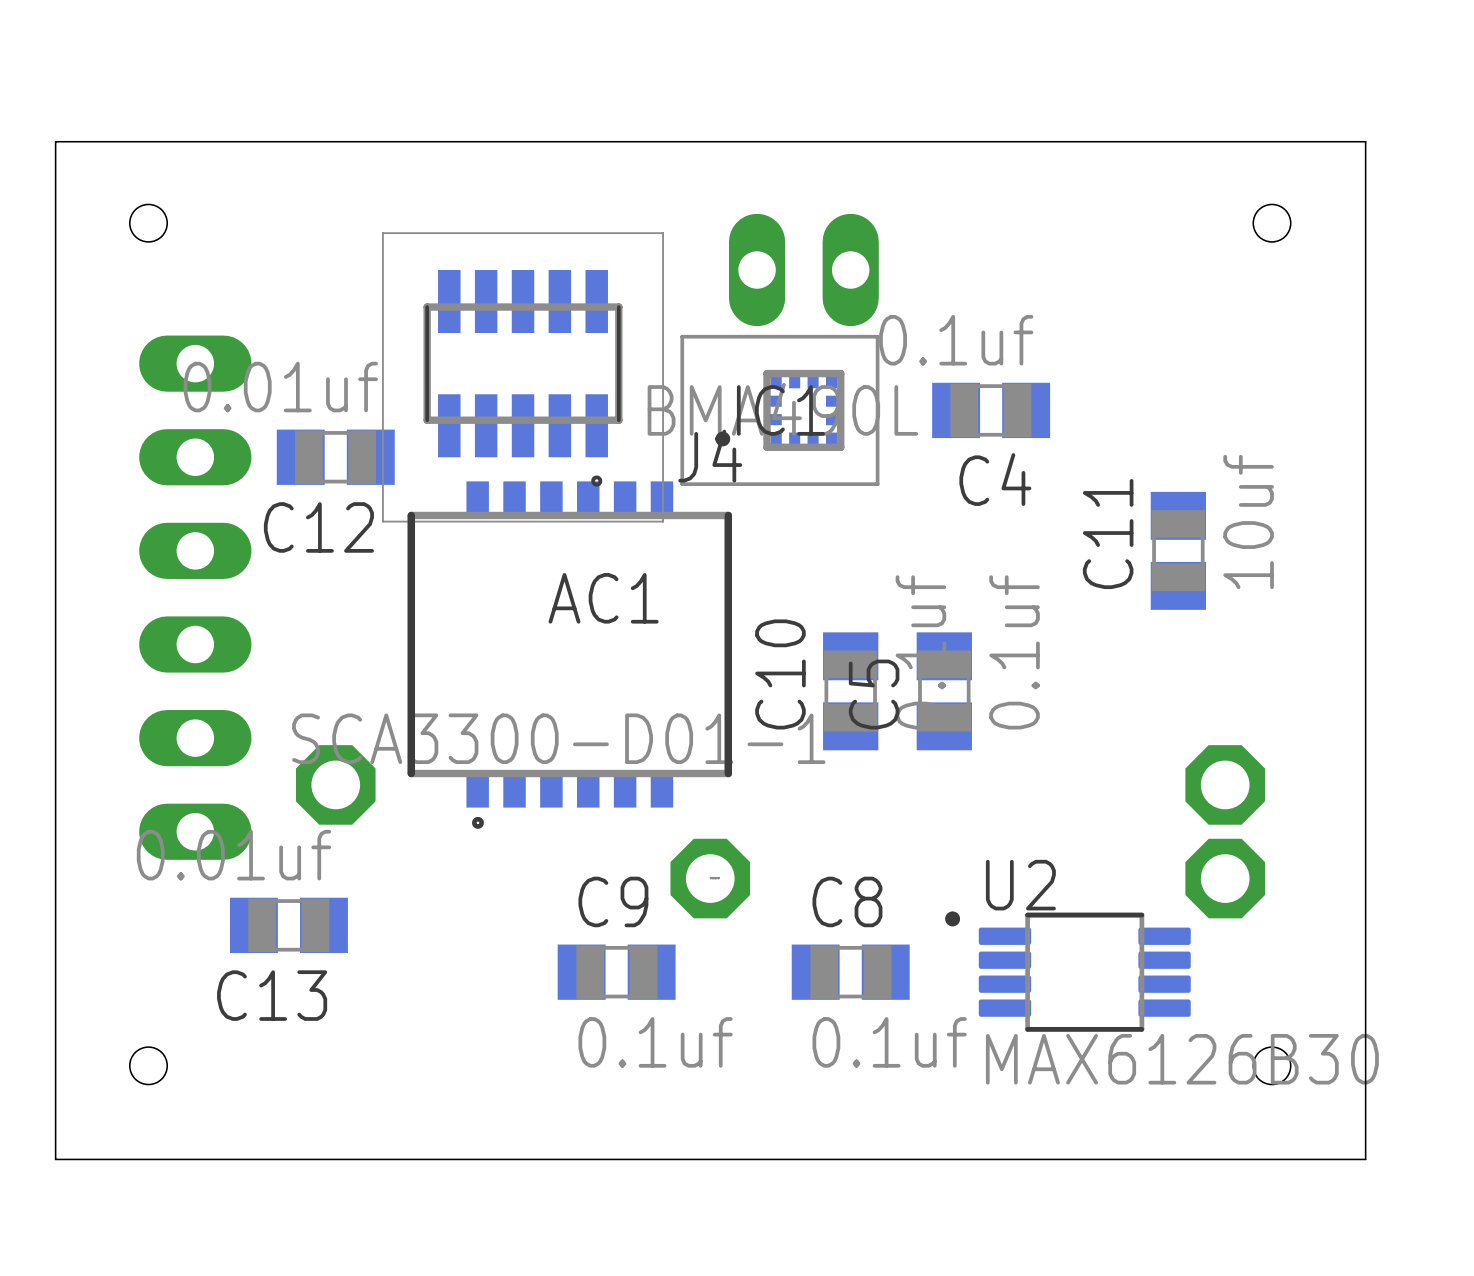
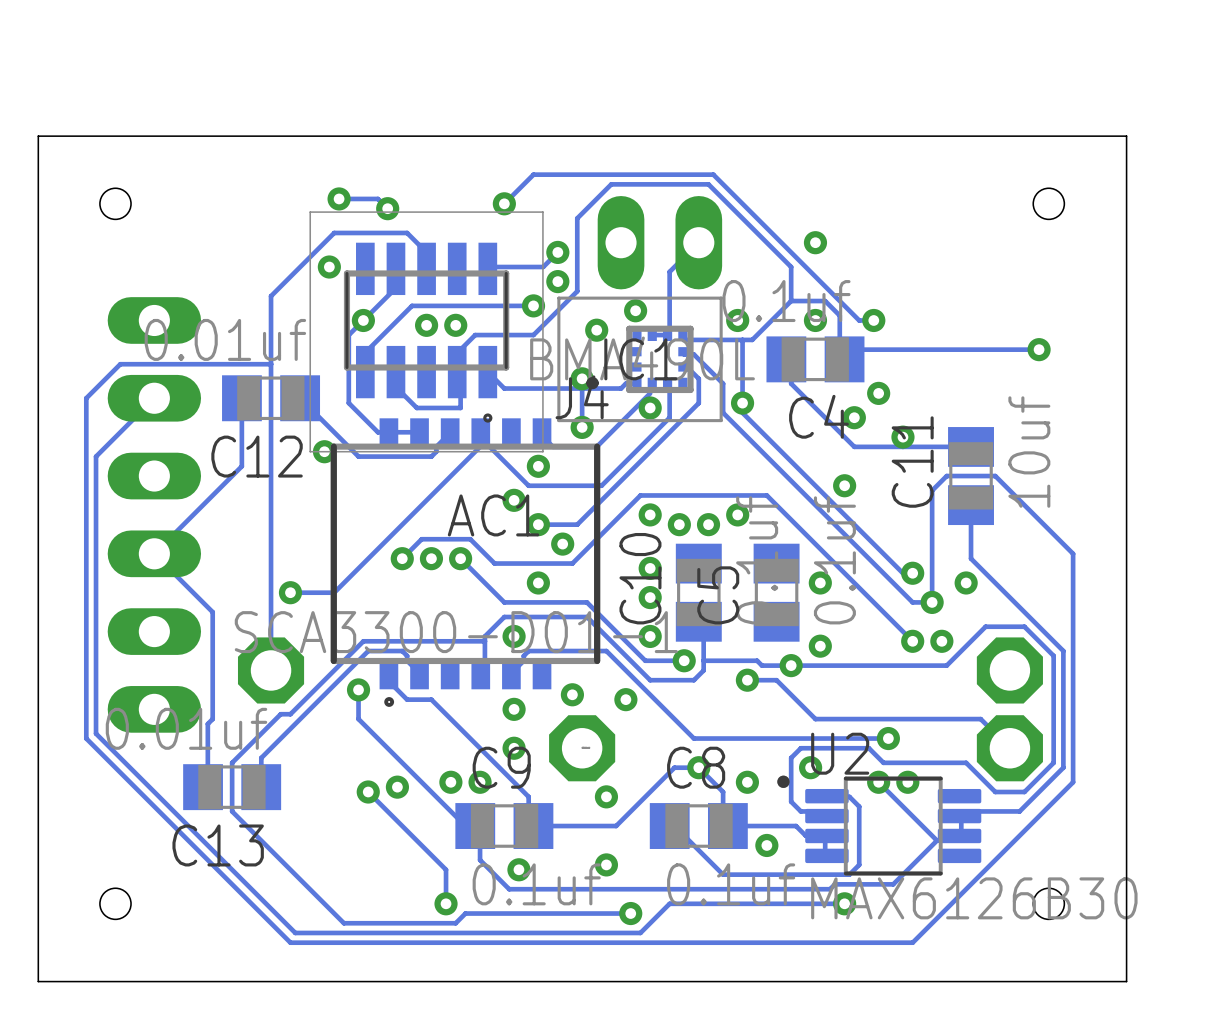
track: none -> (339, 198) (377, 198) (387, 208)
via: none -> (339, 198)
track: none -> (504, 203) (533, 174) (713, 174) (859, 320) (873, 320)
via: none -> (504, 203)
via: none -> (387, 208)
track: none -> (698, 242) (669, 271) (669, 335) (652, 335)
via: none -> (815, 242)
track: none -> (557, 252) (543, 267) (489, 267) (487, 268)
via: none -> (557, 252)
via: none -> (329, 267)
track: none -> (395, 268) (392, 271) (392, 291) (348, 335) (348, 403) (377, 432) (419, 433)
track: none -> (426, 268) (426, 252) (407, 232) (334, 232) (271, 296) (271, 670)
via: none -> (557, 281)
track: none -> (791, 301) (752, 339) (684, 339) (682, 335)
track: none -> (791, 301) (825, 301) (839, 315) (839, 359) (844, 359) (839, 349) (1039, 349)
track: none -> (791, 301) (791, 267) (708, 184) (611, 184) (577, 218) (577, 291) (533, 335) (475, 335) (460, 349) (460, 369) (457, 372) (460, 373) (460, 407) (416, 407) (397, 388) (395, 372)
track: none -> (533, 305) (412, 305) (368, 349) (368, 369) (365, 372)
via: none -> (533, 305)
via: none -> (635, 310)
via: none -> (363, 320)
via: none -> (737, 320)
via: none -> (815, 320)
via: none -> (873, 320)
via: none -> (426, 325)
via: none -> (455, 325)
via: none -> (596, 330)
track: none -> (742, 339) (742, 412) (902, 573) (912, 573)
via: none -> (1039, 349)
track: none -> (683, 351) (684, 354) (693, 354) (723, 383) (723, 412) (912, 602) (932, 602) (932, 490) (946, 476) (995, 476) (1073, 553) (1073, 782) (912, 942) (290, 942) (86, 738) (86, 398) (120, 364) (271, 364)
track: none -> (786, 359) (791, 359) (791, 383) (854, 446) (971, 446)
track: none -> (683, 367) (684, 369) (689, 369) (698, 378) (698, 403) (577, 524) (538, 524)
track: none -> (487, 372) (504, 388) (621, 388) (625, 383) (636, 383)
track: none -> (582, 378) (582, 427)
via: none -> (582, 378)
track: none -> (667, 383) (669, 383) (669, 417) (601, 485) (528, 485) (480, 437) (480, 433) (484, 442) (334, 592) (290, 592)
track: none -> (650, 393) (596, 446) (552, 446) (542, 433)
via: none -> (878, 393)
track: none -> (154, 398) (96, 456) (96, 733) (295, 932) (640, 932) (669, 903) (844, 903)
track: none -> (241, 398) (241, 466) (154, 553) (212, 612) (212, 719) (207, 723) (207, 787) (203, 787)
track: none -> (300, 398) (358, 456) (431, 456) (436, 451) (436, 446) (450, 433)
via: none -> (742, 403)
via: none -> (650, 407)
via: none -> (854, 417)
via: none -> (582, 427)
via: none -> (902, 437)
via: none -> (324, 451)
via: none -> (538, 466)
via: none -> (844, 485)
via: none -> (514, 500)
track: none -> (971, 505) (971, 558) (1063, 651) (1063, 767) (1019, 811) (961, 811) (959, 816) (961, 816) (961, 835) (956, 840) (936, 840)
via: none -> (650, 514)
via: none -> (737, 514)
via: none -> (538, 524)
via: none -> (679, 524)
via: none -> (708, 524)
via: none -> (562, 544)
track: none -> (402, 558) (421, 539) (470, 539) (494, 563) (572, 563) (640, 495) (766, 495) (912, 641)
via: none -> (402, 558)
via: none -> (431, 558)
track: none -> (460, 558) (504, 602) (587, 602) (645, 660) (684, 660)
via: none -> (460, 558)
via: none -> (650, 568)
via: none -> (912, 573)
via: none -> (538, 582)
via: none -> (820, 582)
via: none -> (966, 582)
via: none -> (290, 592)
via: none -> (650, 597)
via: none -> (932, 602)
track: none -> (698, 621) (703, 626) (703, 670) (693, 680) (650, 680) (587, 617) (504, 617) (484, 636) (484, 670) (480, 674)
via: none -> (514, 636)
via: none -> (650, 636)
track: none -> (484, 641) (363, 641) (290, 714) (280, 714) (232, 762) (232, 811) (343, 923) (455, 923) (465, 913) (630, 913)
via: none -> (912, 641)
via: none -> (941, 641)
via: none -> (820, 646)
via: none -> (684, 660)
track: none -> (703, 660) (757, 660) (762, 665) (946, 665) (985, 626) (1024, 626) (1053, 655) (1053, 762) (1024, 792) (995, 792) (966, 762) (883, 762) (868, 748) (800, 748) (791, 757) (791, 801) (800, 811) (825, 811) (826, 816)
via: none -> (791, 665)
track: none -> (388, 674) (392, 675) (392, 685) (407, 699) (431, 699) (528, 796) (528, 826) (616, 826) (674, 767) (698, 767) (723, 792) (723, 826) (796, 826) (805, 835) (826, 835) (825, 840) (825, 855) (826, 855)
track: none -> (419, 674) (407, 660) (407, 655) (402, 651) (368, 651) (261, 757) (261, 787)
track: none -> (511, 674) (523, 660) (523, 655) (528, 651) (606, 651) (693, 738) (888, 738)
track: none -> (747, 680) (776, 680) (815, 719) (980, 719) (1009, 748)
via: none -> (747, 680)
track: none -> (358, 689) (358, 719) (465, 826) (480, 826) (480, 860) (509, 889) (830, 889) (834, 884) (893, 884) (936, 840)
via: none -> (358, 689)
via: none -> (572, 694)
via: none -> (625, 699)
via: none -> (514, 709)
via: none -> (888, 738)
via: none -> (514, 748)
via: none -> (698, 767)
via: none -> (810, 767)
via: none -> (450, 782)
via: none -> (480, 782)
via: none -> (747, 782)
track: none -> (878, 782) (936, 840)
via: none -> (878, 782)
via: none -> (907, 782)
via: none -> (397, 787)
track: none -> (368, 792) (446, 869) (446, 903)
via: none -> (368, 792)
track: none -> (826, 796) (849, 796) (859, 806) (859, 864) (849, 874) (723, 874) (674, 826) (669, 826)
via: none -> (606, 796)
via: none -> (766, 845)
via: none -> (606, 864)
via: none -> (518, 869)
via: none -> (446, 903)
via: none -> (844, 903)
via: none -> (630, 913)

